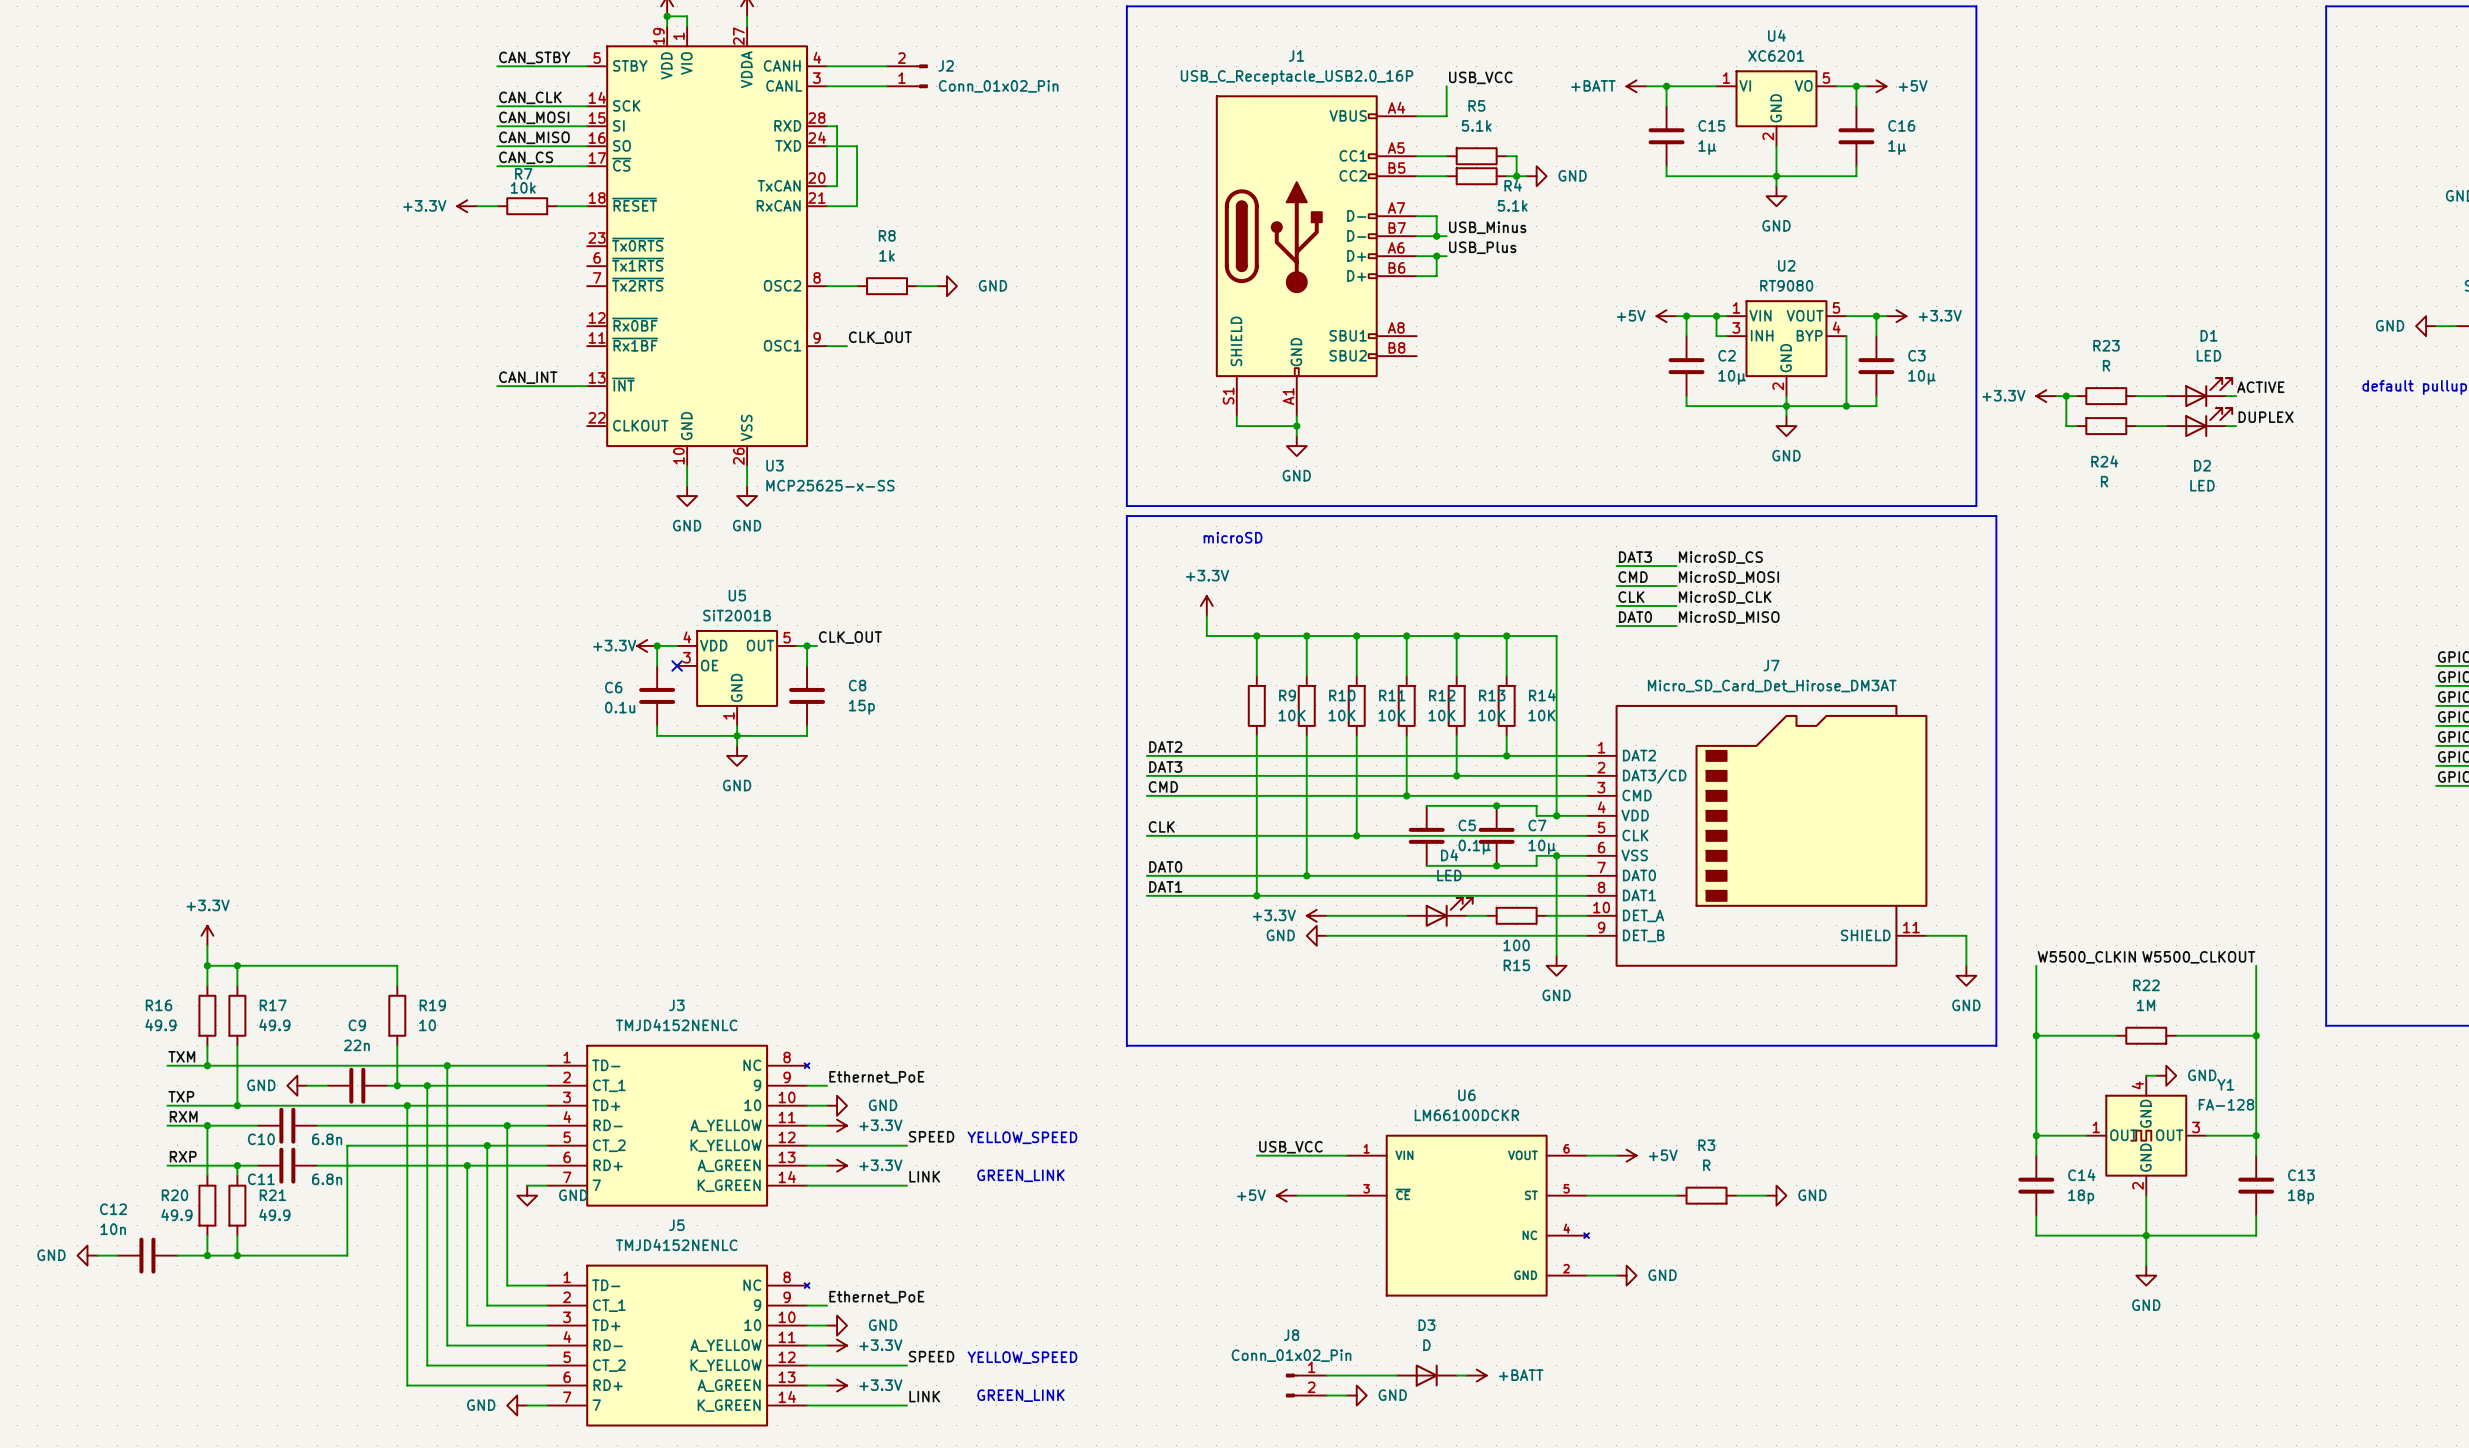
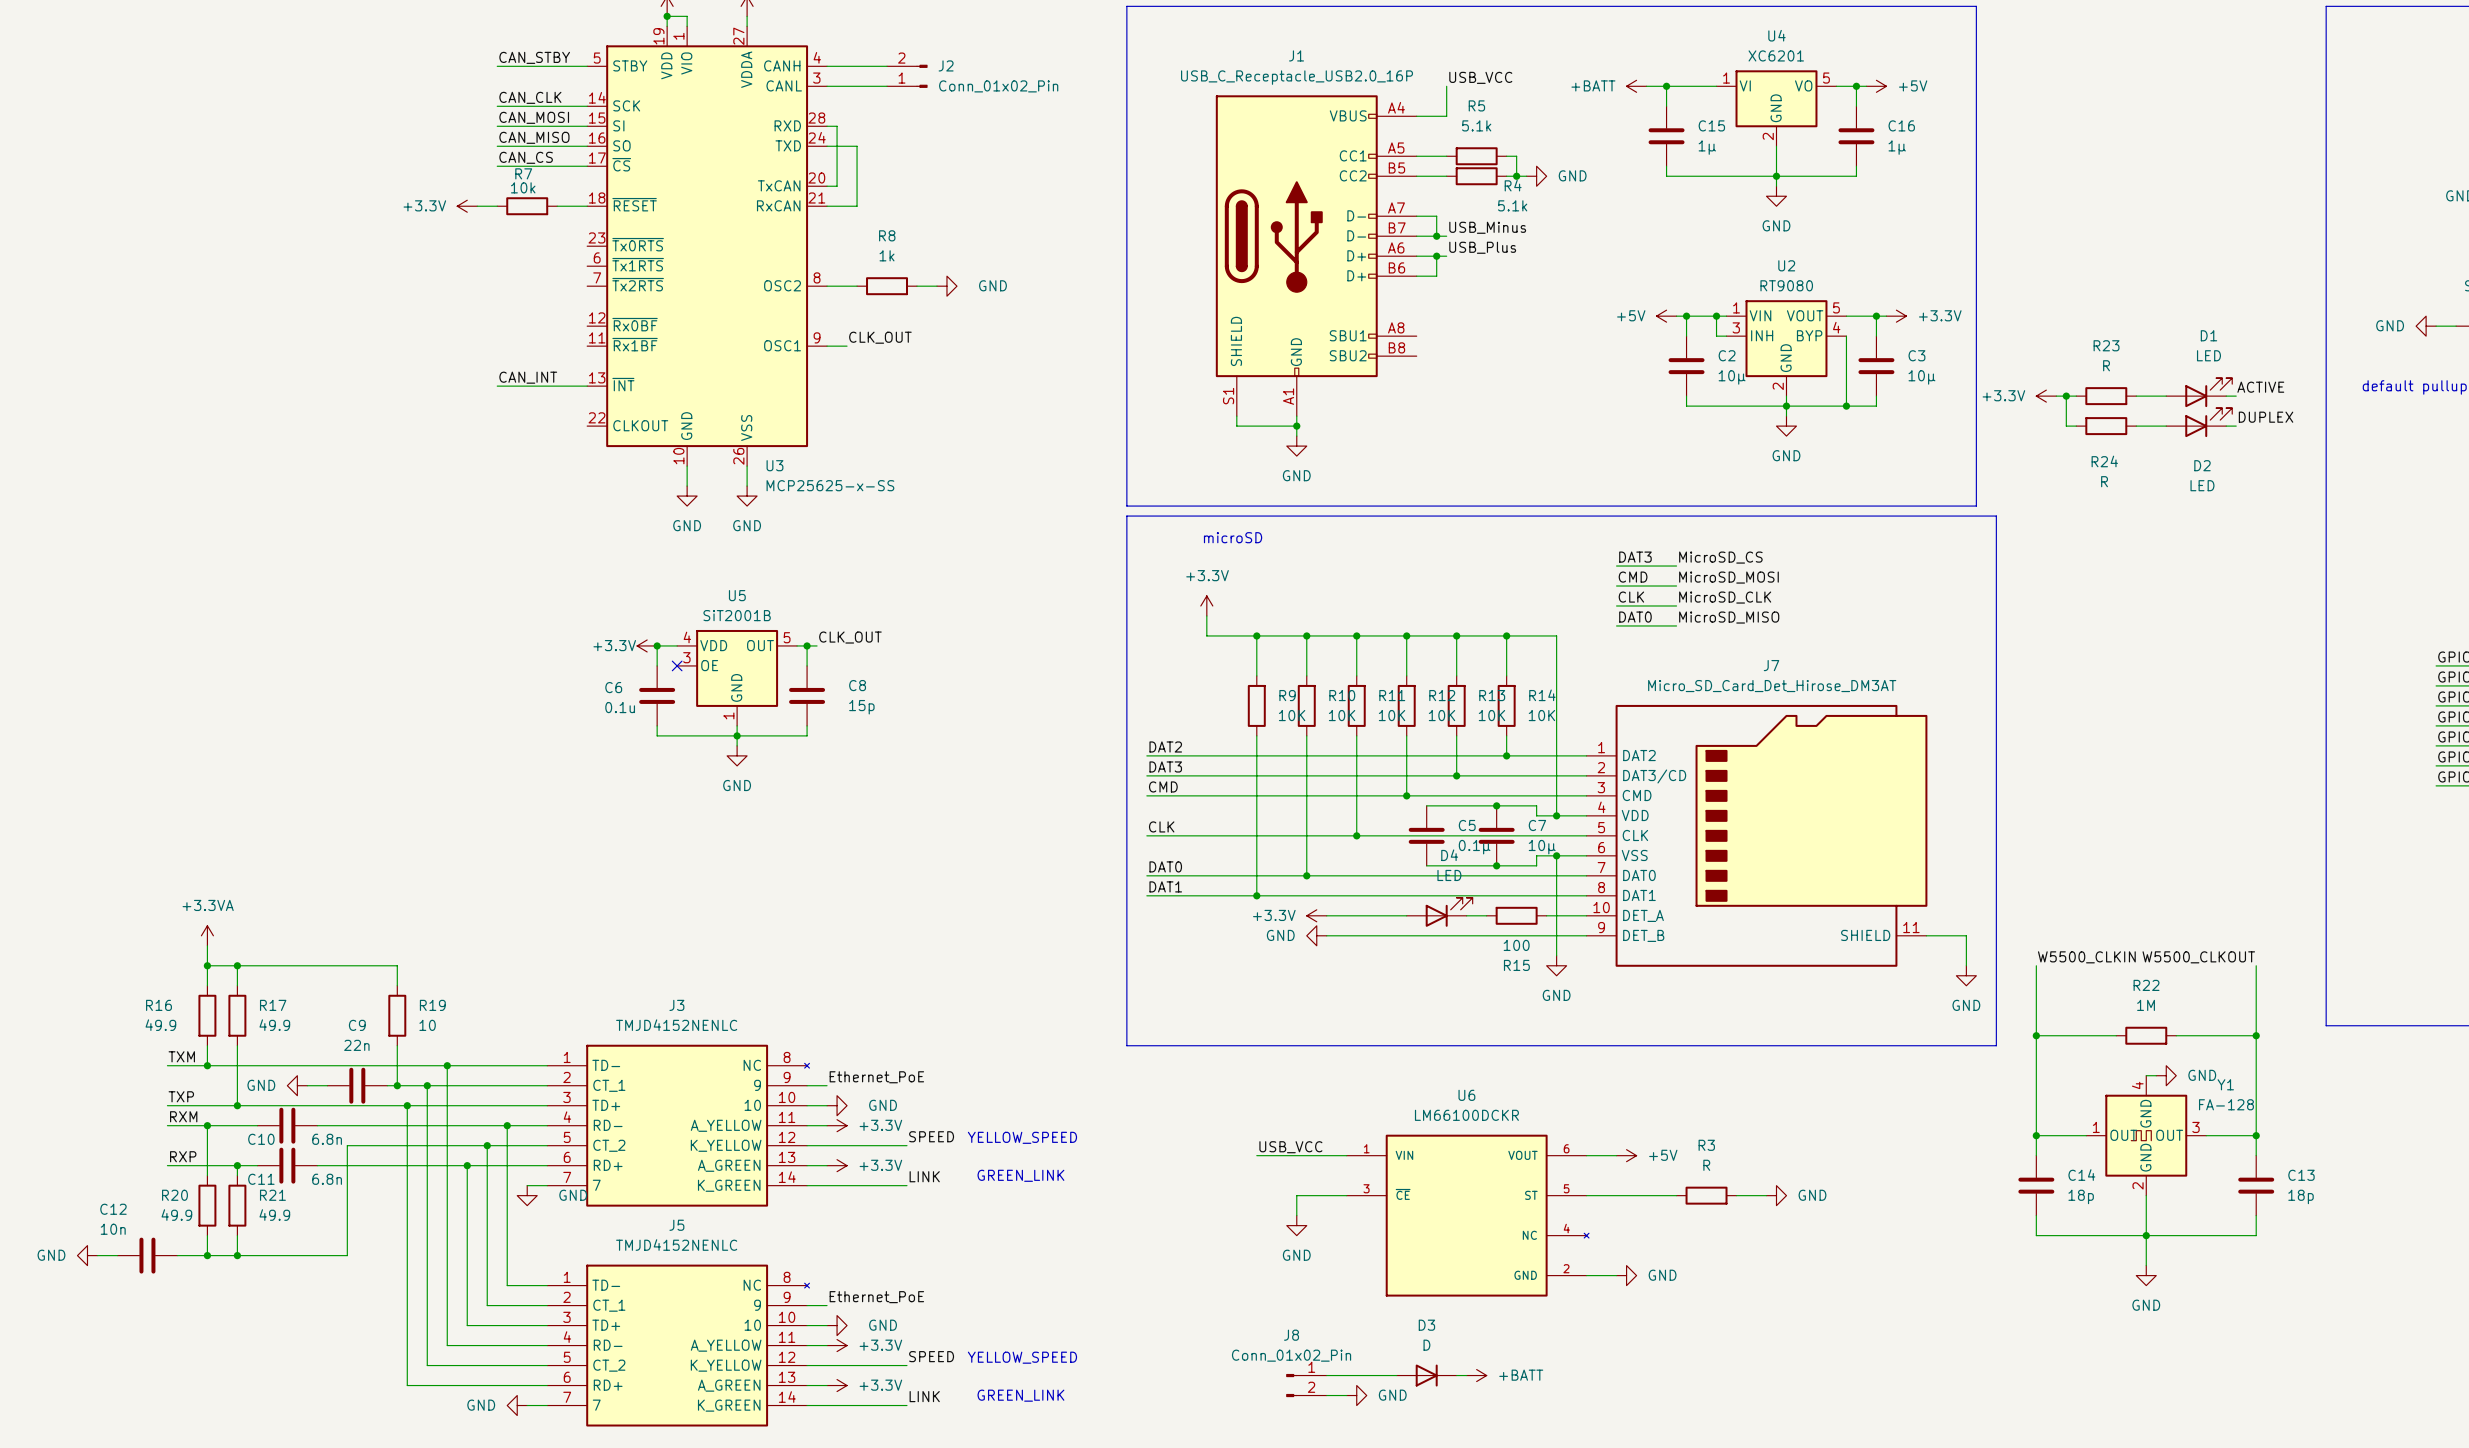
power symbol: +3.3V (207, 935) -> +3.3VA (207, 935)
power symbol: +5V (1286, 1195) -> none
wire: none -> (1296, 1195) (1296, 1215)
power symbol: none -> GND (1296, 1225)

